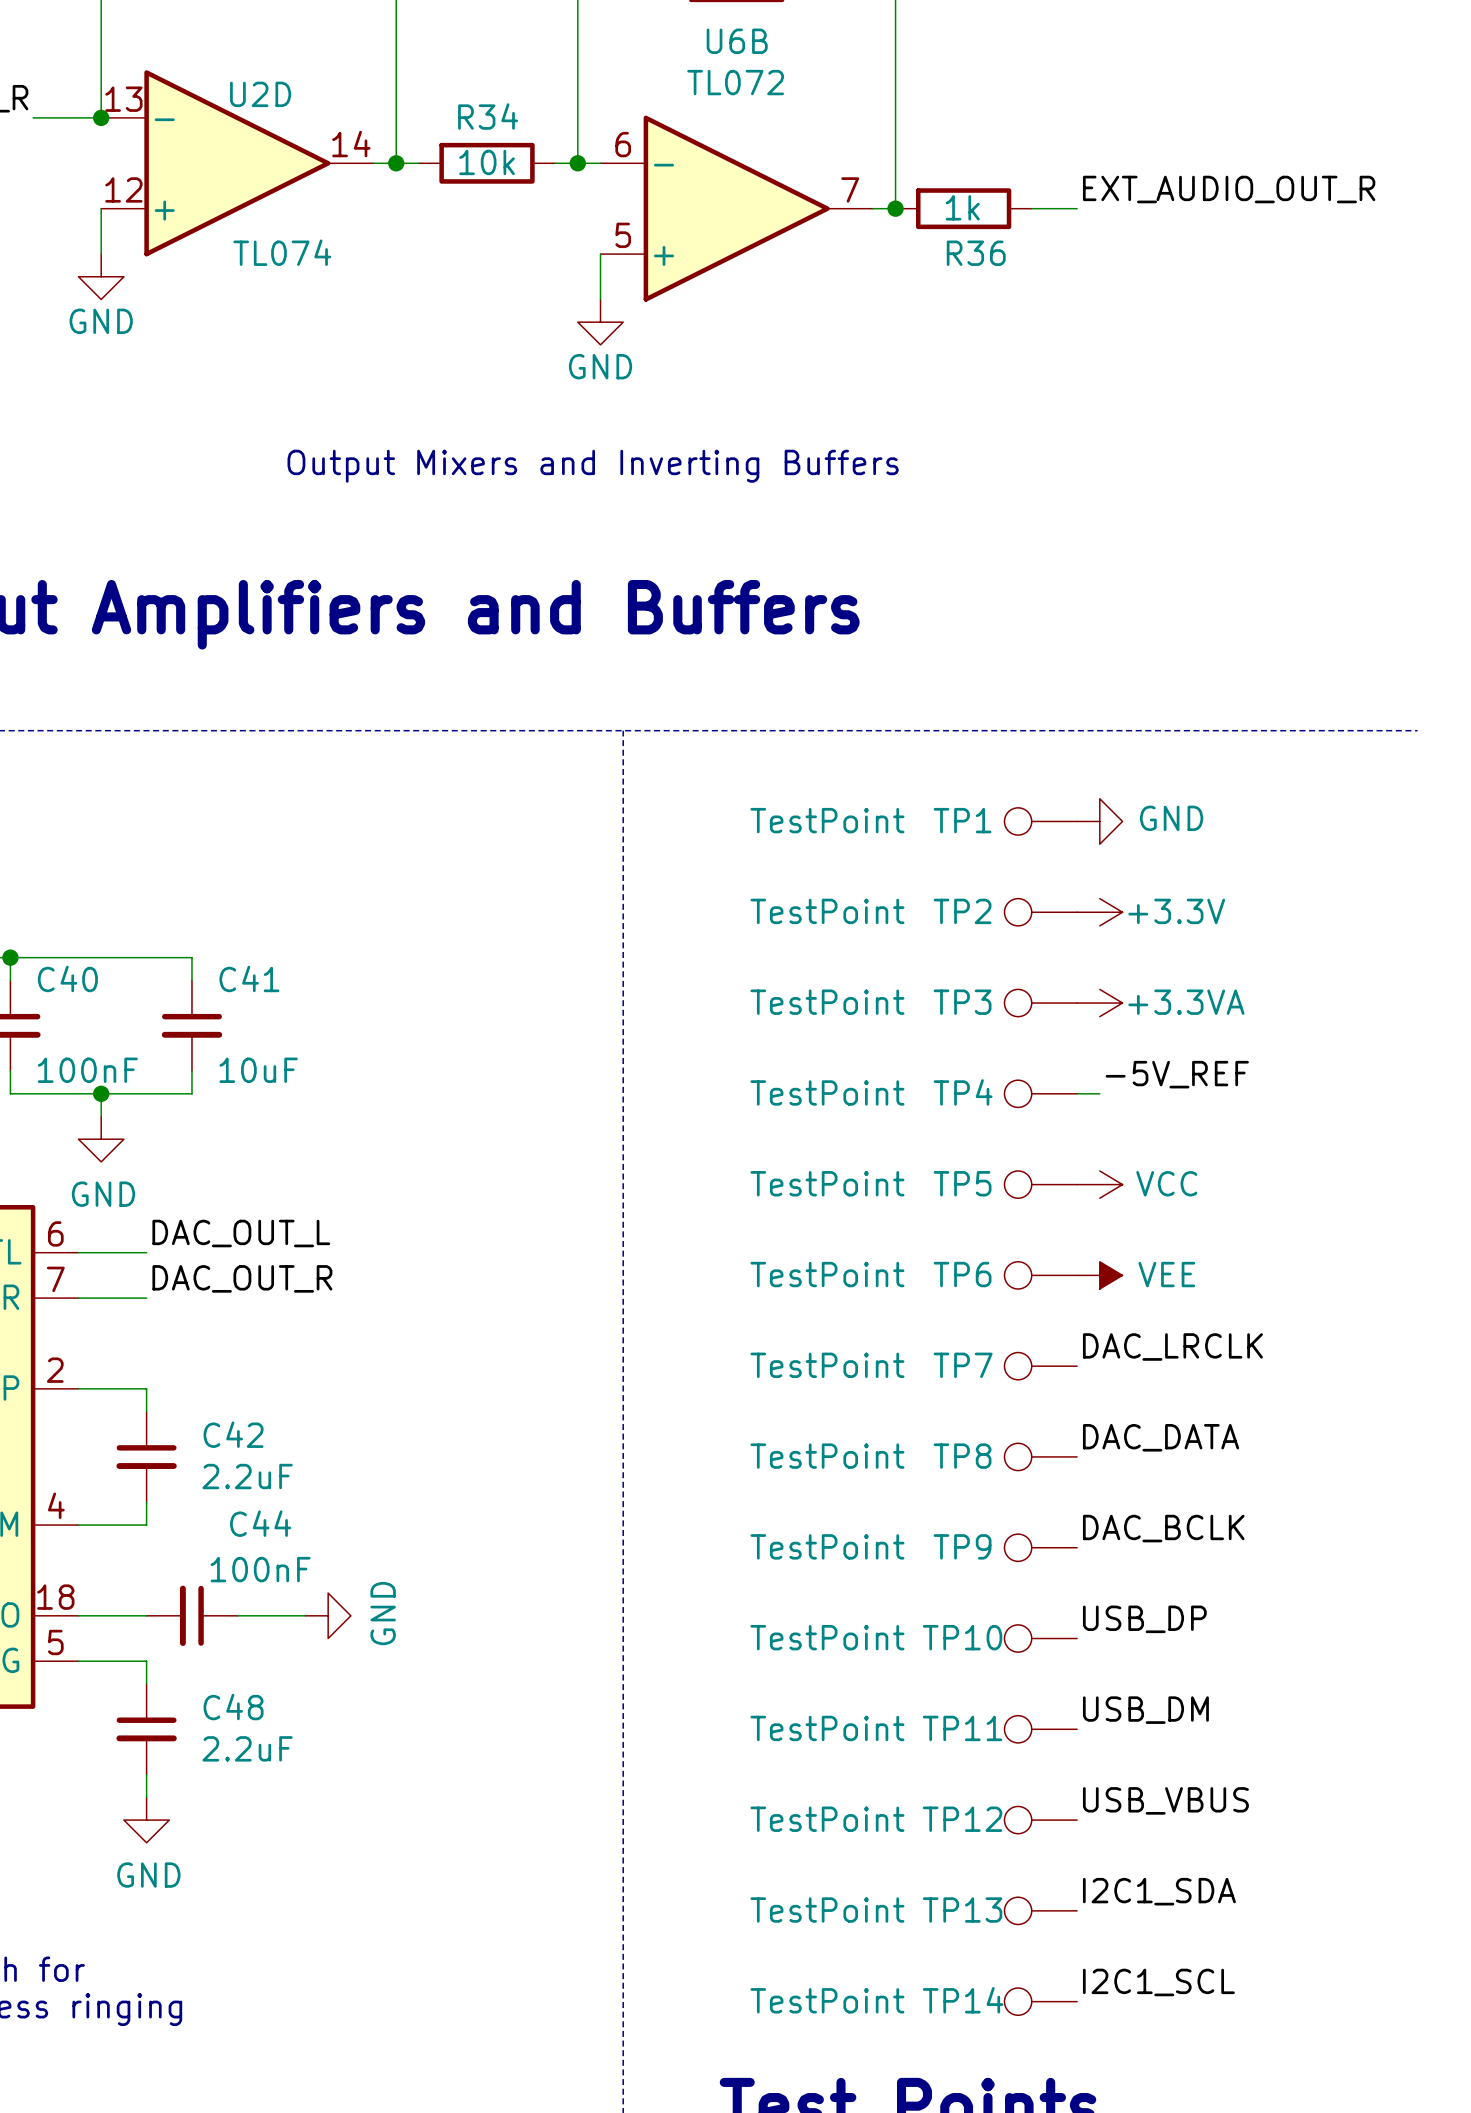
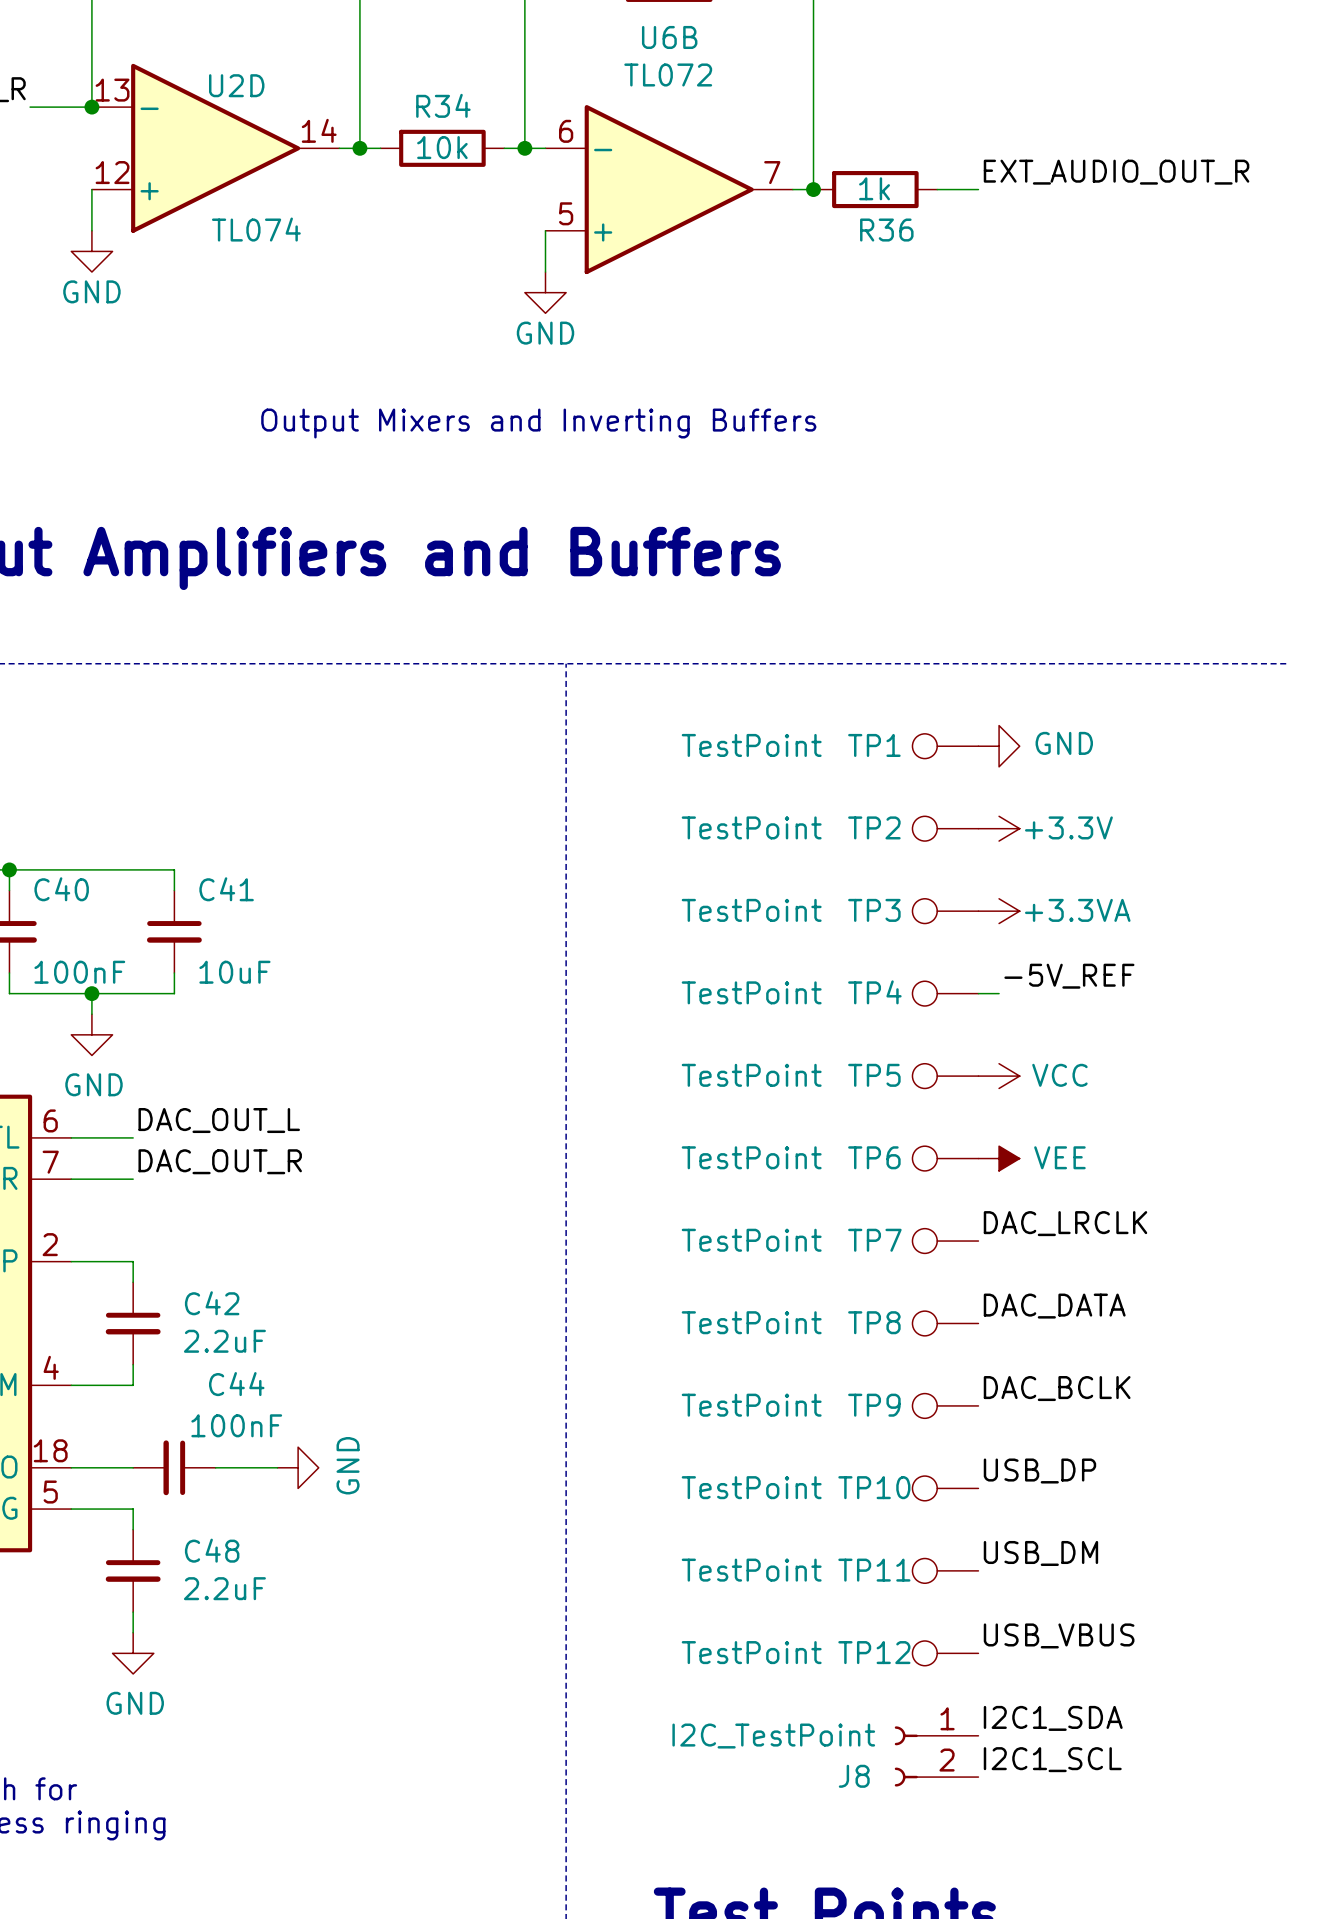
TP13: TestPoint (1040, 1910) -> none
J8: none -> I2C_TestPoint (936, 1756)
label position: I2C1_SCL (1158, 1982) -> I2C1_SCL (1052, 1759)
TP14: TestPoint (1040, 2001) -> none

